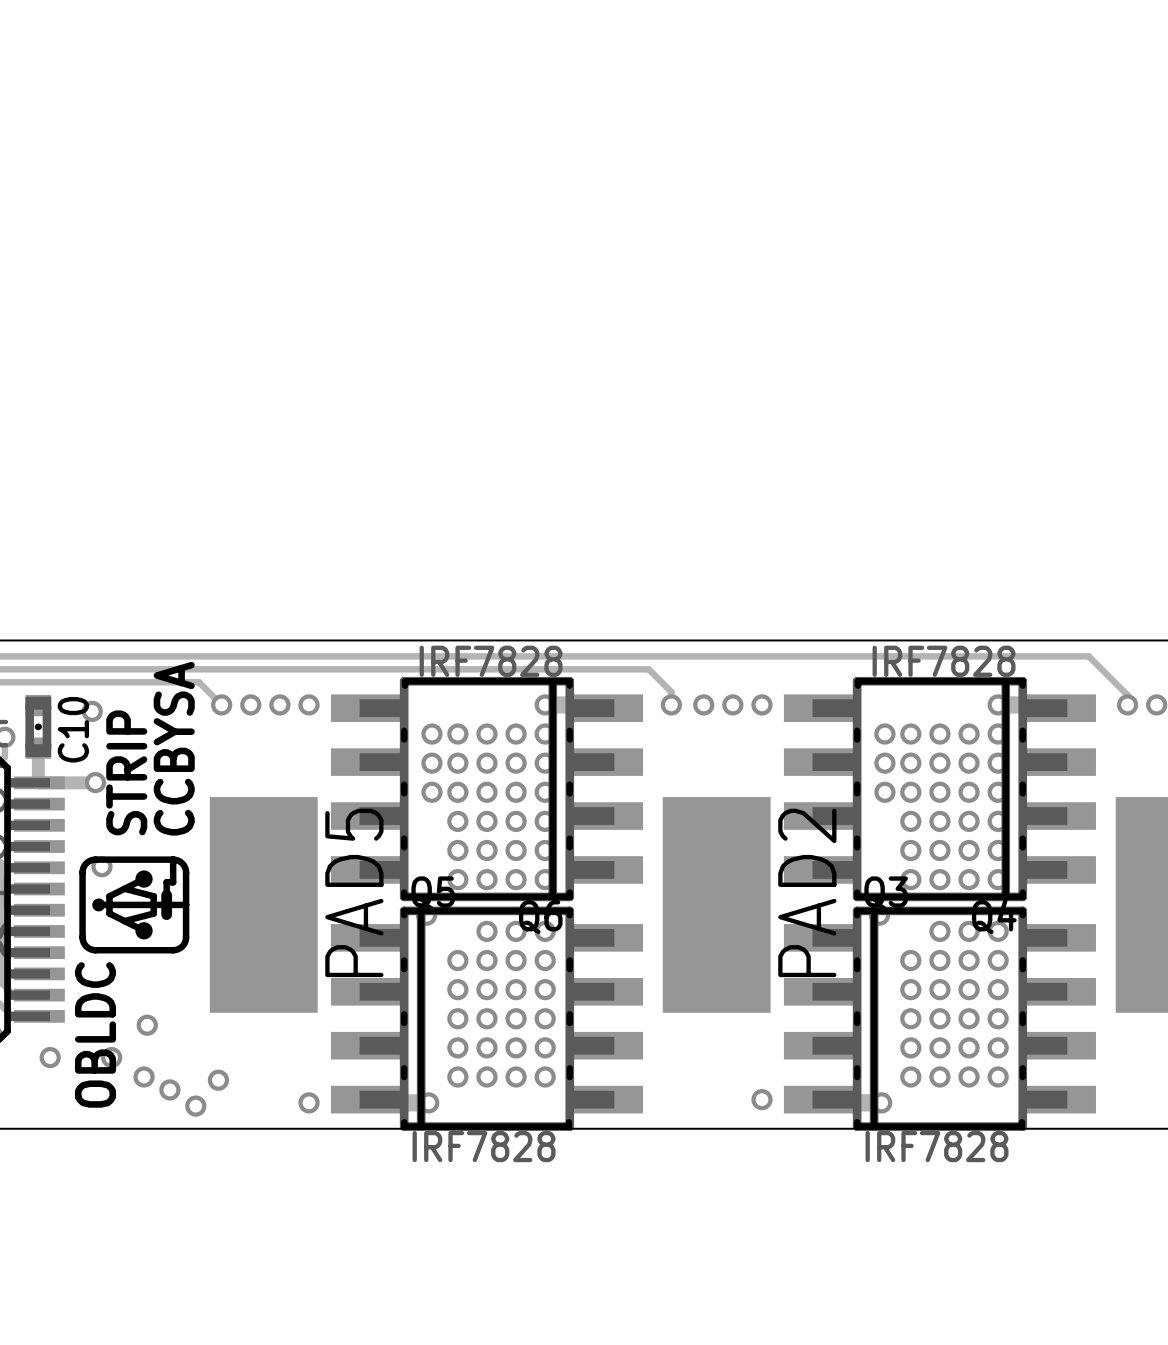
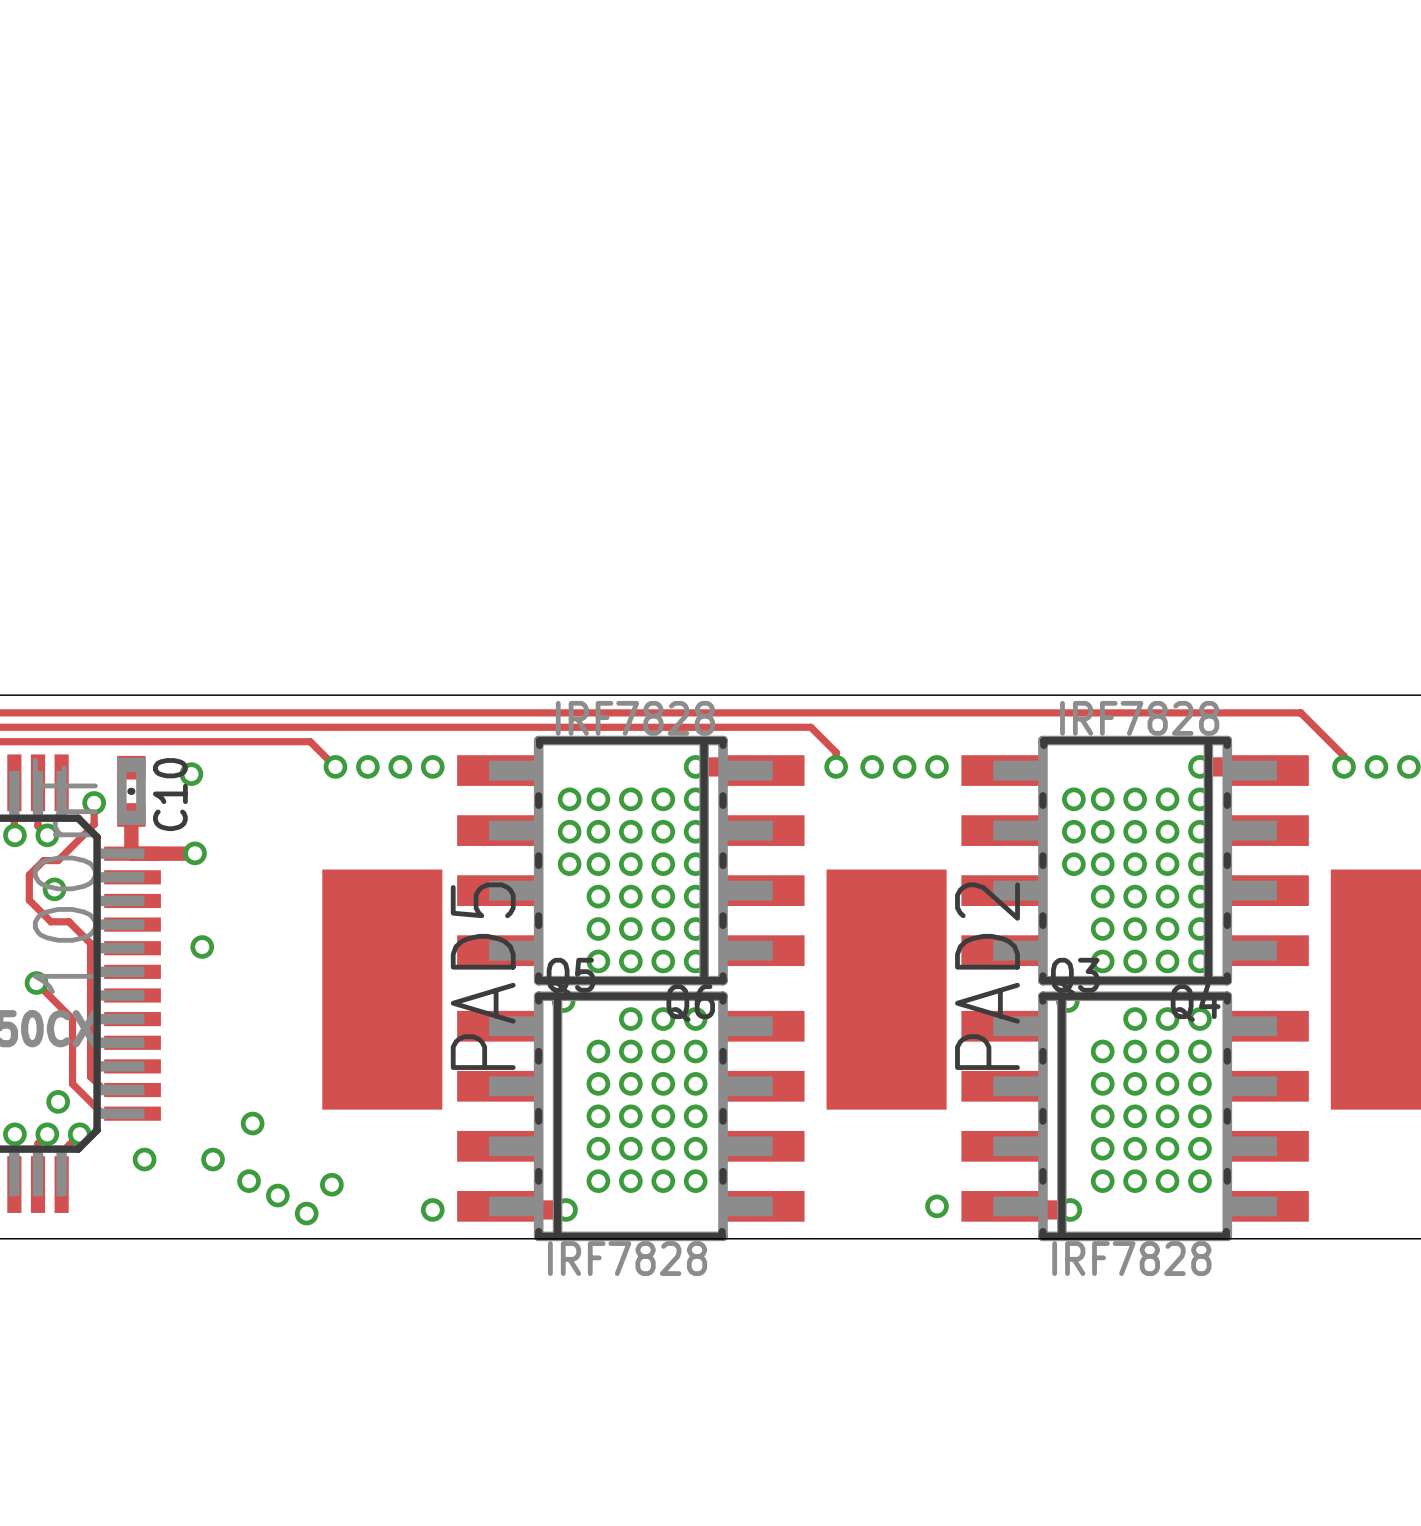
text: CCBYSA (174, 748) -> none
text: STRIP (126, 772) -> none
drawing: [79, 856, 190, 954] -> none
text: OBLDC (95, 1034) -> none

